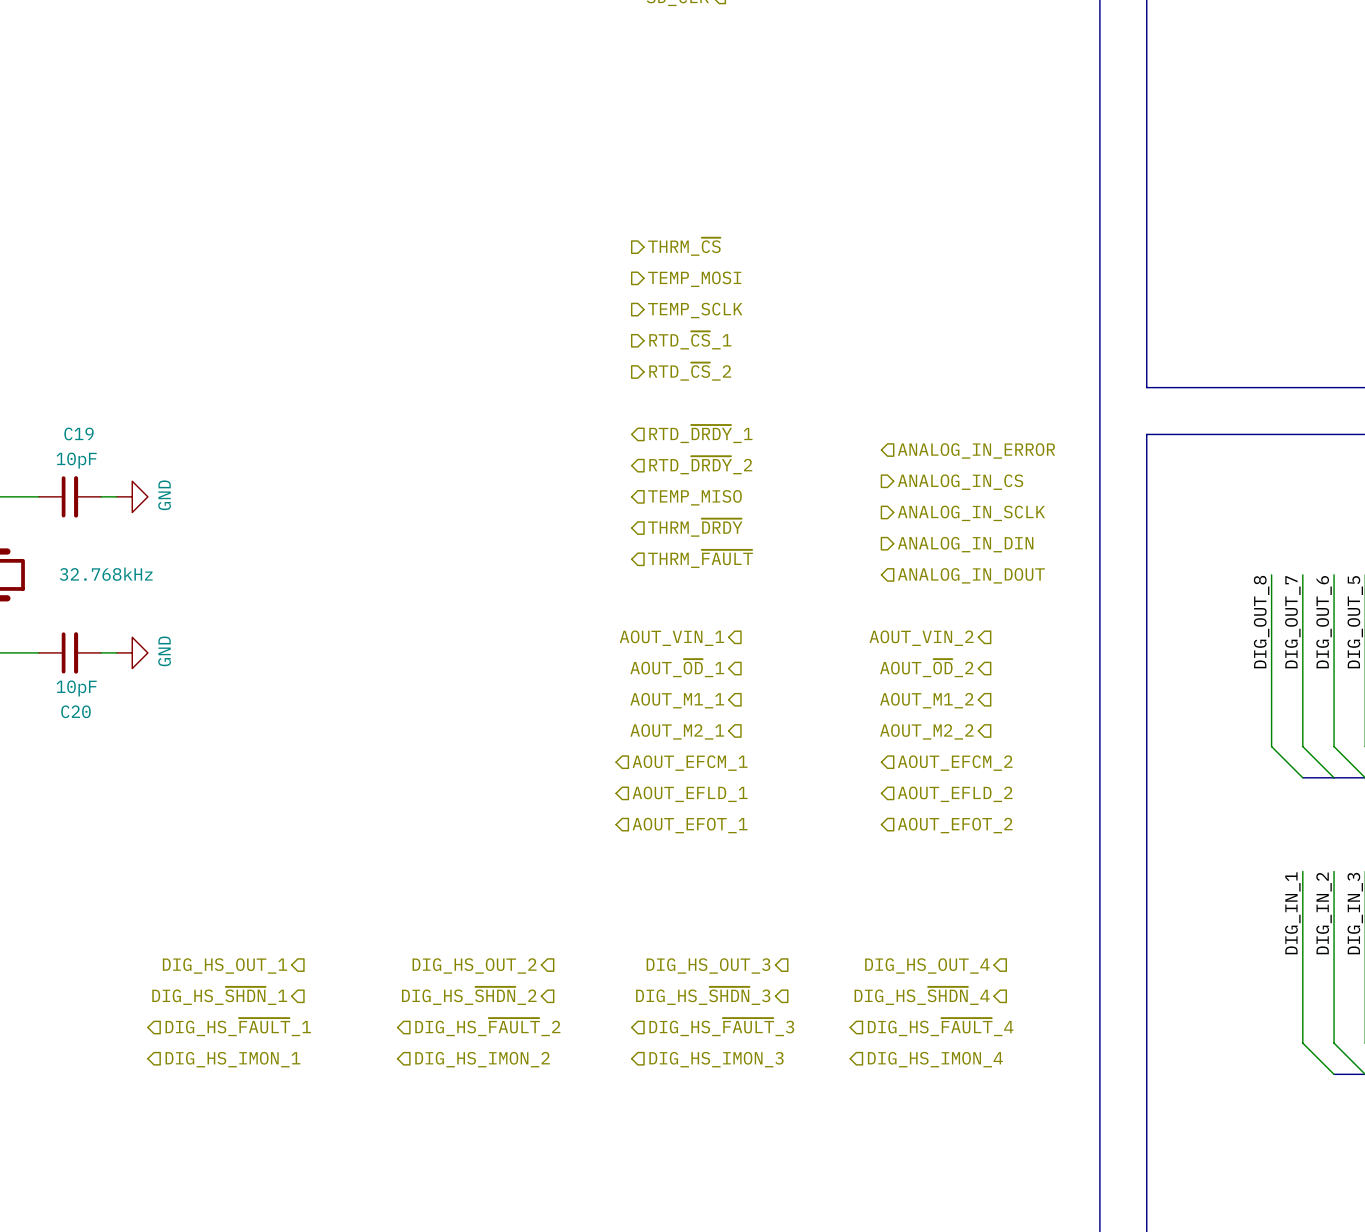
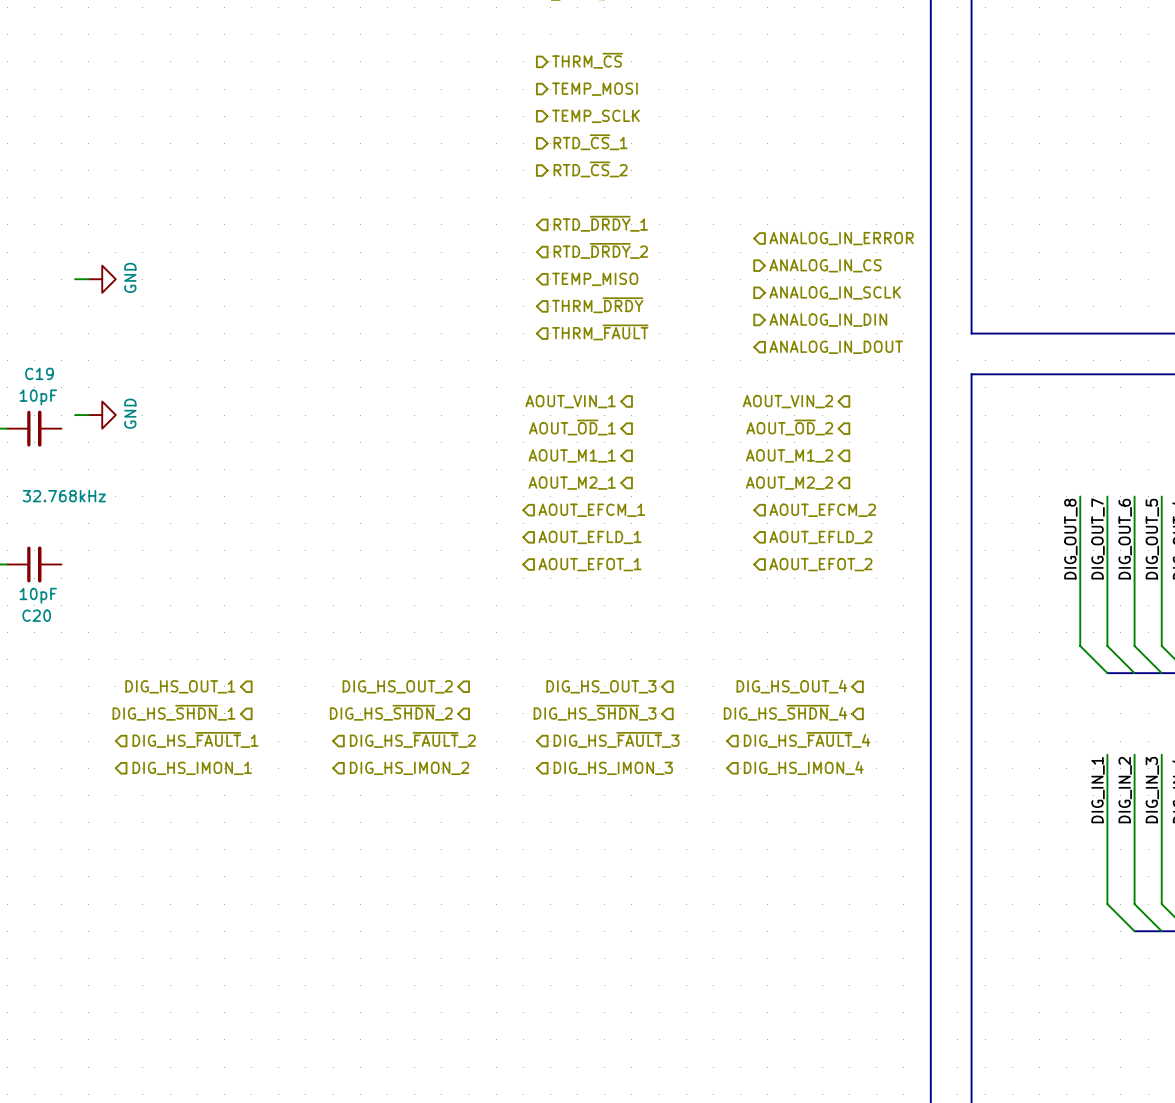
hierarchical label position: THRM_~{CS} (684, 246) -> THRM_~{CS} (587, 60)
hierarchical label position: TEMP_MOSI (694, 279) -> TEMP_MOSI (594, 89)
hierarchical label position: TEMP_SCLK (695, 310) -> TEMP_SCLK (595, 116)
power symbol: none -> GND (102, 279)
hierarchical label position: RTD_~{CS}_1 (690, 340) -> RTD_~{CS}_1 (590, 142)
hierarchical label position: RTD_~{CS}_2 (690, 371) -> RTD_~{CS}_2 (590, 169)
hierarchical label position: RTD_~{DRDY}_1 (700, 434) -> RTD_~{DRDY}_1 (600, 223)
hierarchical label position: ANALOG_IN_ERROR (976, 450) -> ANALOG_IN_ERROR (841, 238)
hierarchical label position: RTD_~{DRDY}_2 (700, 465) -> RTD_~{DRDY}_2 (600, 250)
hierarchical label position: ANALOG_IN_CS (960, 482) -> ANALOG_IN_CS (825, 265)
wire: (101, 496) (116, 496) -> (75, 279) (88, 279)
power symbol position: GND (132, 496) -> GND (102, 415)
hierarchical label position: TEMP_MISO (694, 497) -> TEMP_MISO (595, 279)
hierarchical label position: ANALOG_IN_SCLK (971, 513) -> ANALOG_IN_SCLK (835, 292)
hierarchical label position: THRM_~{DRDY} (695, 527) -> THRM_~{DRDY} (597, 305)
hierarchical label position: ANALOG_IN_DIN (965, 544) -> ANALOG_IN_DIN (828, 320)
hierarchical label position: THRM_~{FAULT} (700, 558) -> THRM_~{FAULT} (600, 332)
hierarchical label position: ANALOG_IN_DOUT (971, 575) -> ANALOG_IN_DOUT (836, 347)
hierarchical label position: AOUT_VIN_1 (671, 638) -> AOUT_VIN_1 (570, 401)
hierarchical label position: AOUT_VIN_2 (921, 638) -> AOUT_VIN_2 (787, 401)
wire: (101, 652) (116, 652) -> (75, 415) (88, 415)
power symbol: GND (132, 652) -> none
hierarchical label position: AOUT_~{OD}_1 (677, 668) -> AOUT_~{OD}_1 (572, 427)
hierarchical label position: AOUT_~{OD}_2 (926, 668) -> AOUT_~{OD}_2 (789, 427)
hierarchical label position: AOUT_M1_1 (677, 700) -> AOUT_M1_1 (572, 455)
hierarchical label position: AOUT_M1_2 (926, 700) -> AOUT_M1_2 (789, 455)
hierarchical label position: AOUT_M2_1 (677, 731) -> AOUT_M2_1 (572, 483)
hierarchical label position: AOUT_M2_2 (926, 731) -> AOUT_M2_2 (789, 483)
hierarchical label position: AOUT_EFCM_1 (690, 763) -> AOUT_EFCM_1 (591, 510)
hierarchical label position: AOUT_EFCM_2 (955, 763) -> AOUT_EFCM_2 (822, 510)
hierarchical label position: AOUT_EFLD_1 (690, 794) -> AOUT_EFLD_1 (590, 537)
hierarchical label position: AOUT_EFLD_2 (955, 794) -> AOUT_EFLD_2 (820, 537)
hierarchical label position: AOUT_EFOT_1 (690, 825) -> AOUT_EFOT_1 (590, 564)
hierarchical label position: AOUT_EFOT_2 (955, 825) -> AOUT_EFOT_2 (820, 564)
hierarchical label position: DIG_HS_OUT_1 (224, 966) -> DIG_HS_OUT_1 (180, 686)
hierarchical label position: DIG_HS_OUT_2 (474, 966) -> DIG_HS_OUT_2 (397, 686)
hierarchical label position: DIG_HS_OUT_3 (708, 966) -> DIG_HS_OUT_3 (601, 686)
hierarchical label position: DIG_HS_OUT_4 (927, 966) -> DIG_HS_OUT_4 (791, 686)
hierarchical label position: DIG_HS_~{SHDN}_1 (219, 995) -> DIG_HS_~{SHDN}_1 (173, 712)
hierarchical label position: DIG_HS_~{SHDN}_2 (469, 995) -> DIG_HS_~{SHDN}_2 (391, 712)
hierarchical label position: DIG_HS_~{SHDN}_3 (703, 995) -> DIG_HS_~{SHDN}_3 (595, 712)
hierarchical label position: DIG_HS_~{SHDN}_4 (922, 995) -> DIG_HS_~{SHDN}_4 (785, 712)
hierarchical label position: DIG_HS_~{FAULT}_1 (238, 1027) -> DIG_HS_~{FAULT}_1 (195, 739)
hierarchical label position: DIG_HS_~{FAULT}_2 (487, 1027) -> DIG_HS_~{FAULT}_2 (412, 739)
hierarchical label position: DIG_HS_~{FAULT}_3 (721, 1027) -> DIG_HS_~{FAULT}_3 (616, 739)
hierarchical label position: DIG_HS_~{FAULT}_4 (940, 1027) -> DIG_HS_~{FAULT}_4 (807, 739)
hierarchical label position: DIG_HS_IMON_1 (232, 1059) -> DIG_HS_IMON_1 (192, 768)
hierarchical label position: DIG_HS_IMON_2 (482, 1059) -> DIG_HS_IMON_2 (409, 768)
hierarchical label position: DIG_HS_IMON_3 (716, 1059) -> DIG_HS_IMON_3 (613, 768)
hierarchical label position: DIG_HS_IMON_4 (935, 1059) -> DIG_HS_IMON_4 (803, 768)

